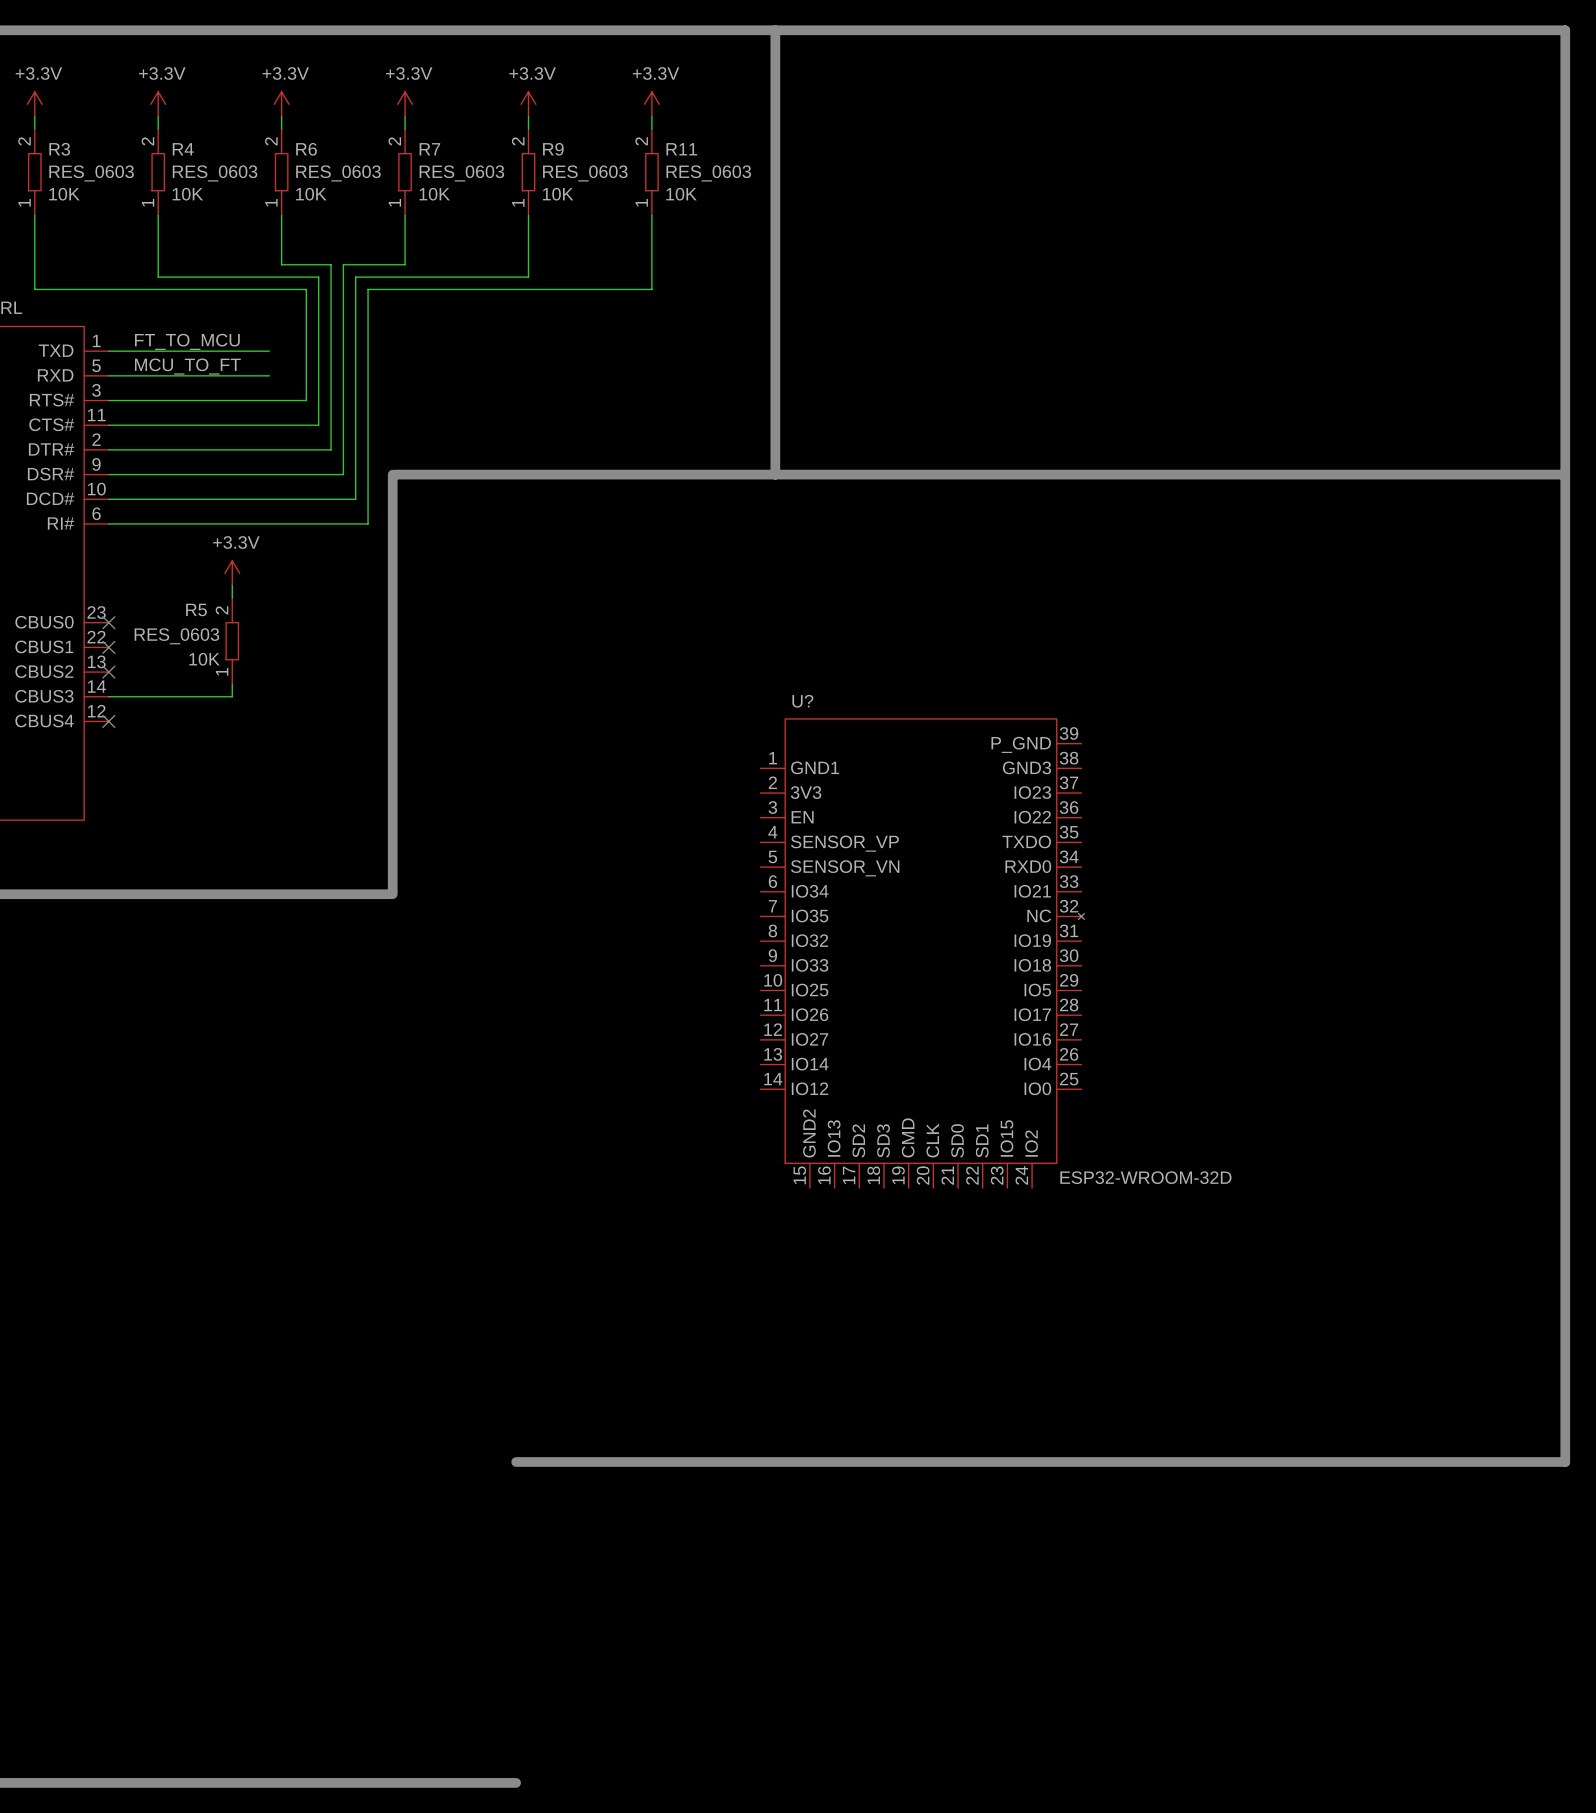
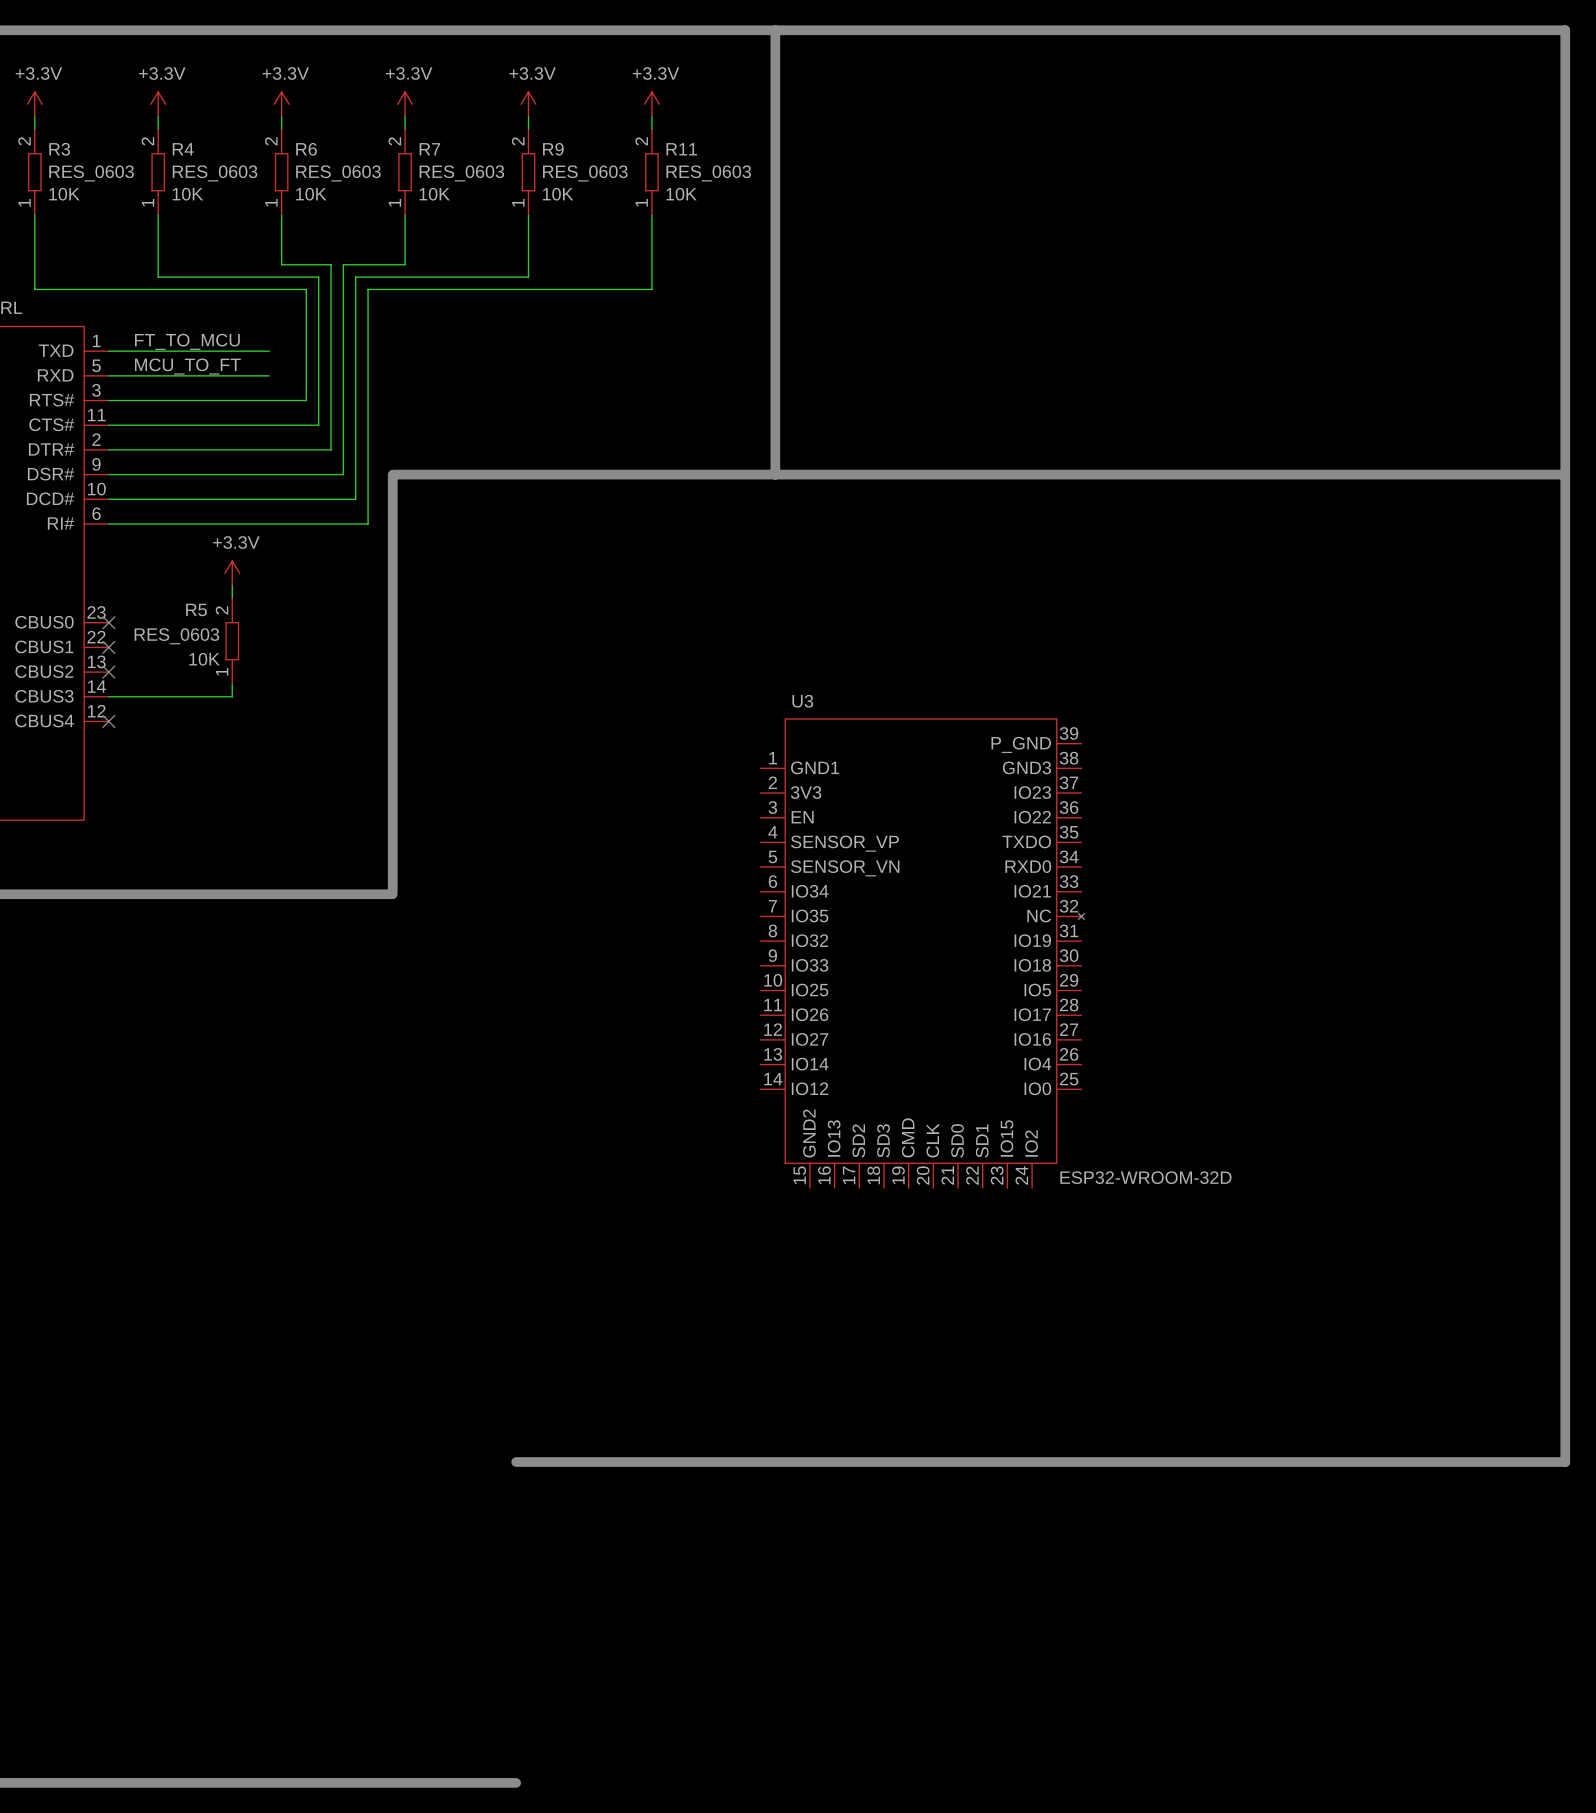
U? name: U? (802, 701) -> U3 (802, 701)

